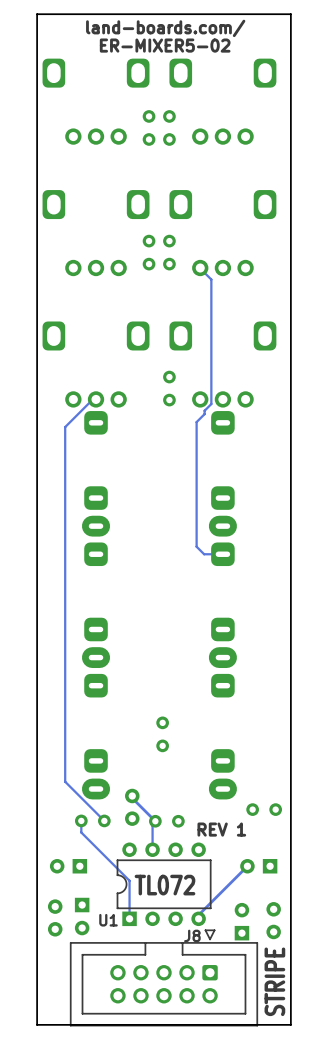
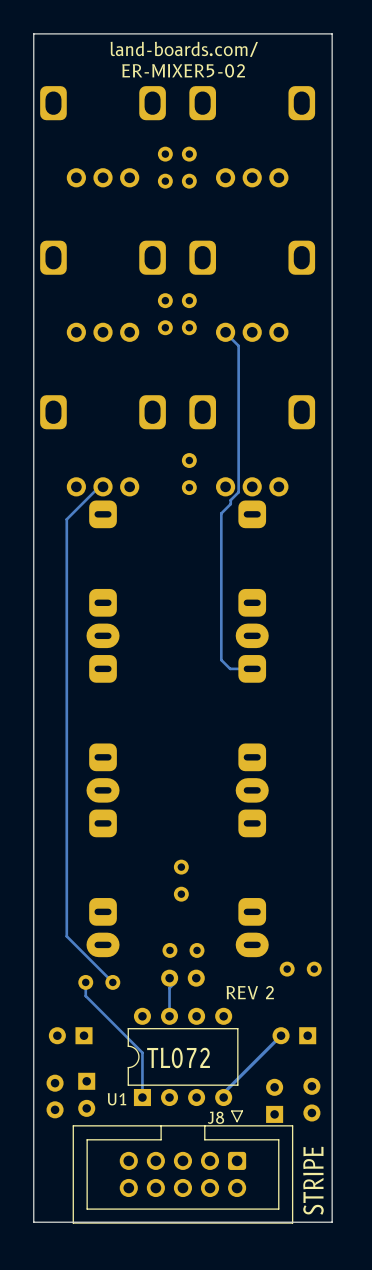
part: none -> (183, 950)
track: (132, 798) (155, 821) -> none
part: (132, 807) -> none
part footprint: [149, 814, 185, 828] -> [161, 969, 205, 987]
text: REV 1 (221, 829) -> REV 2 (250, 992)

